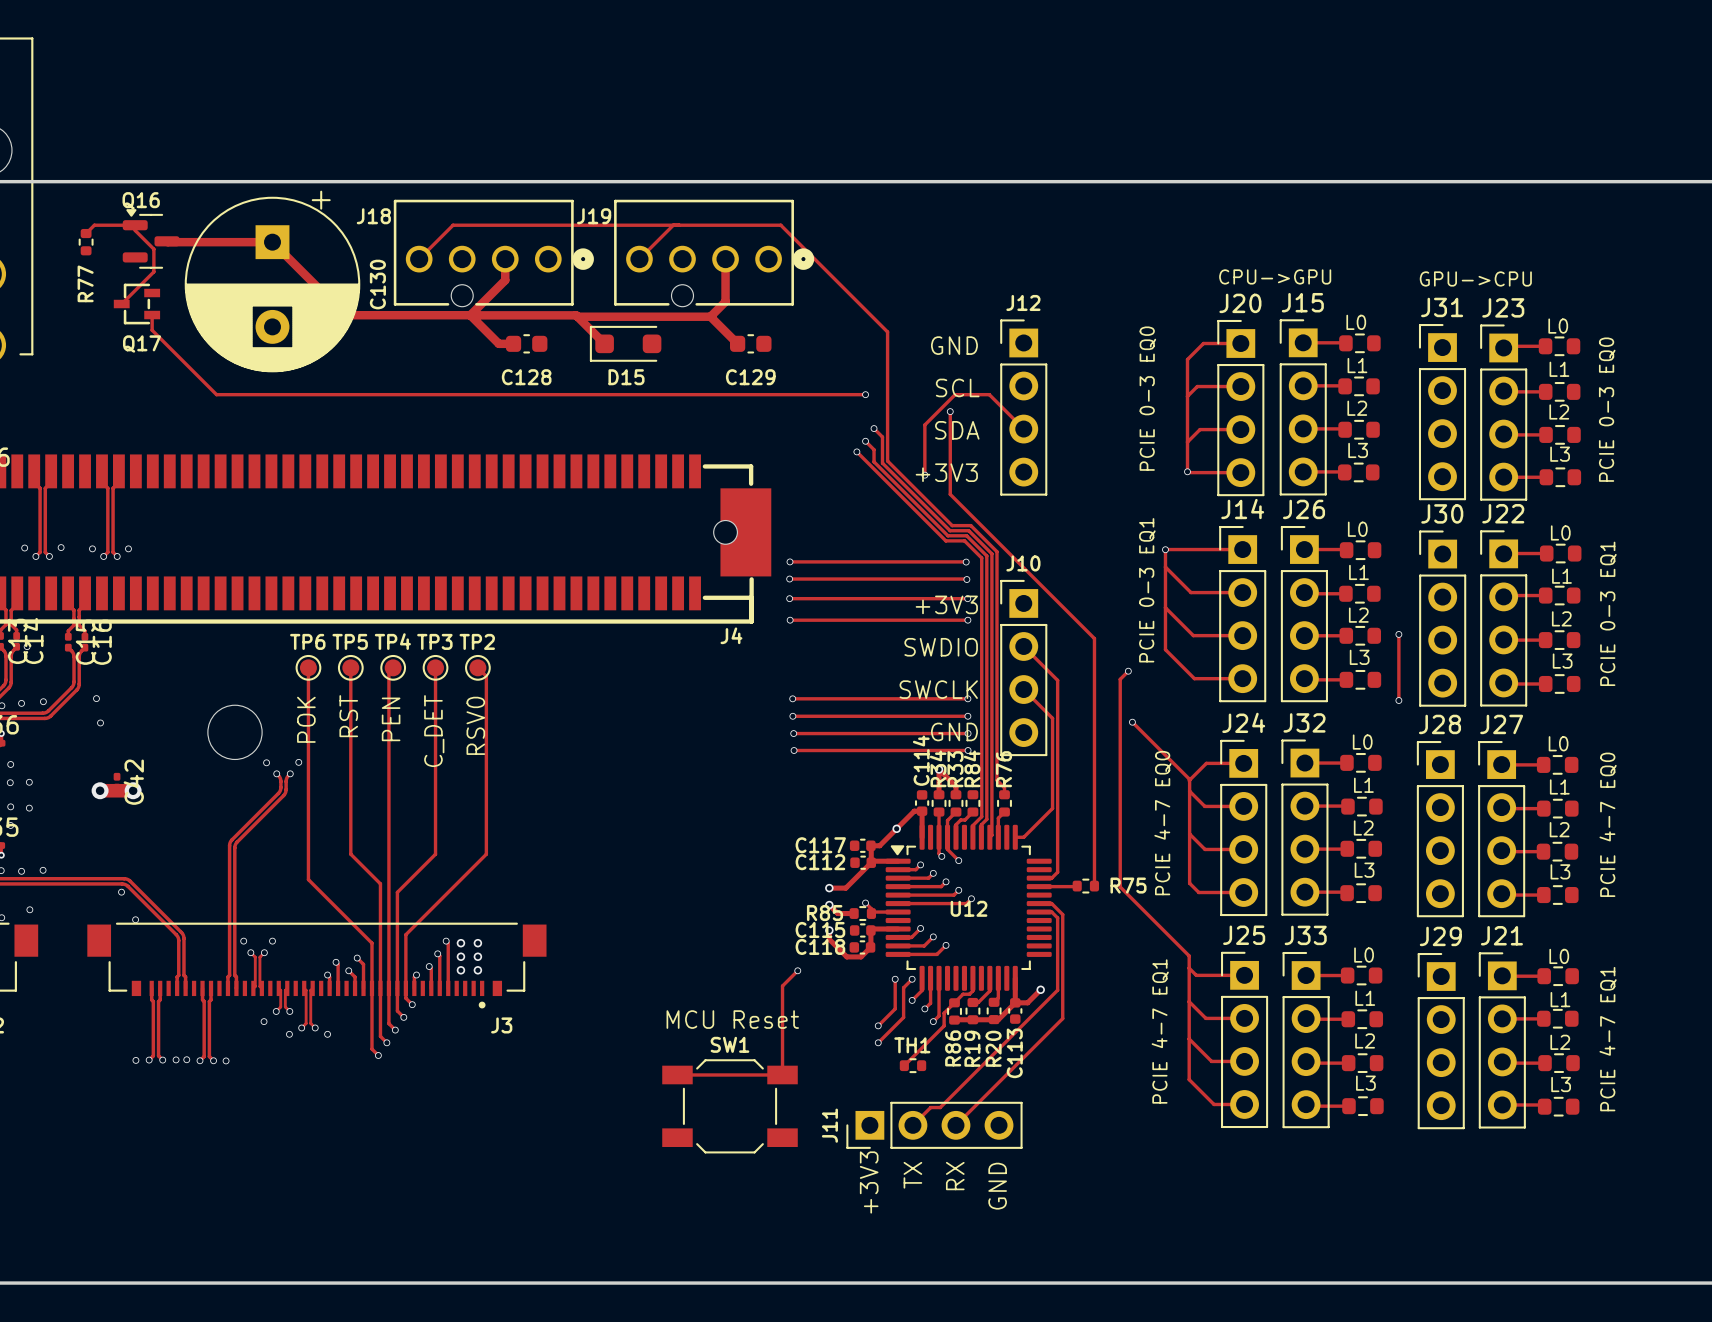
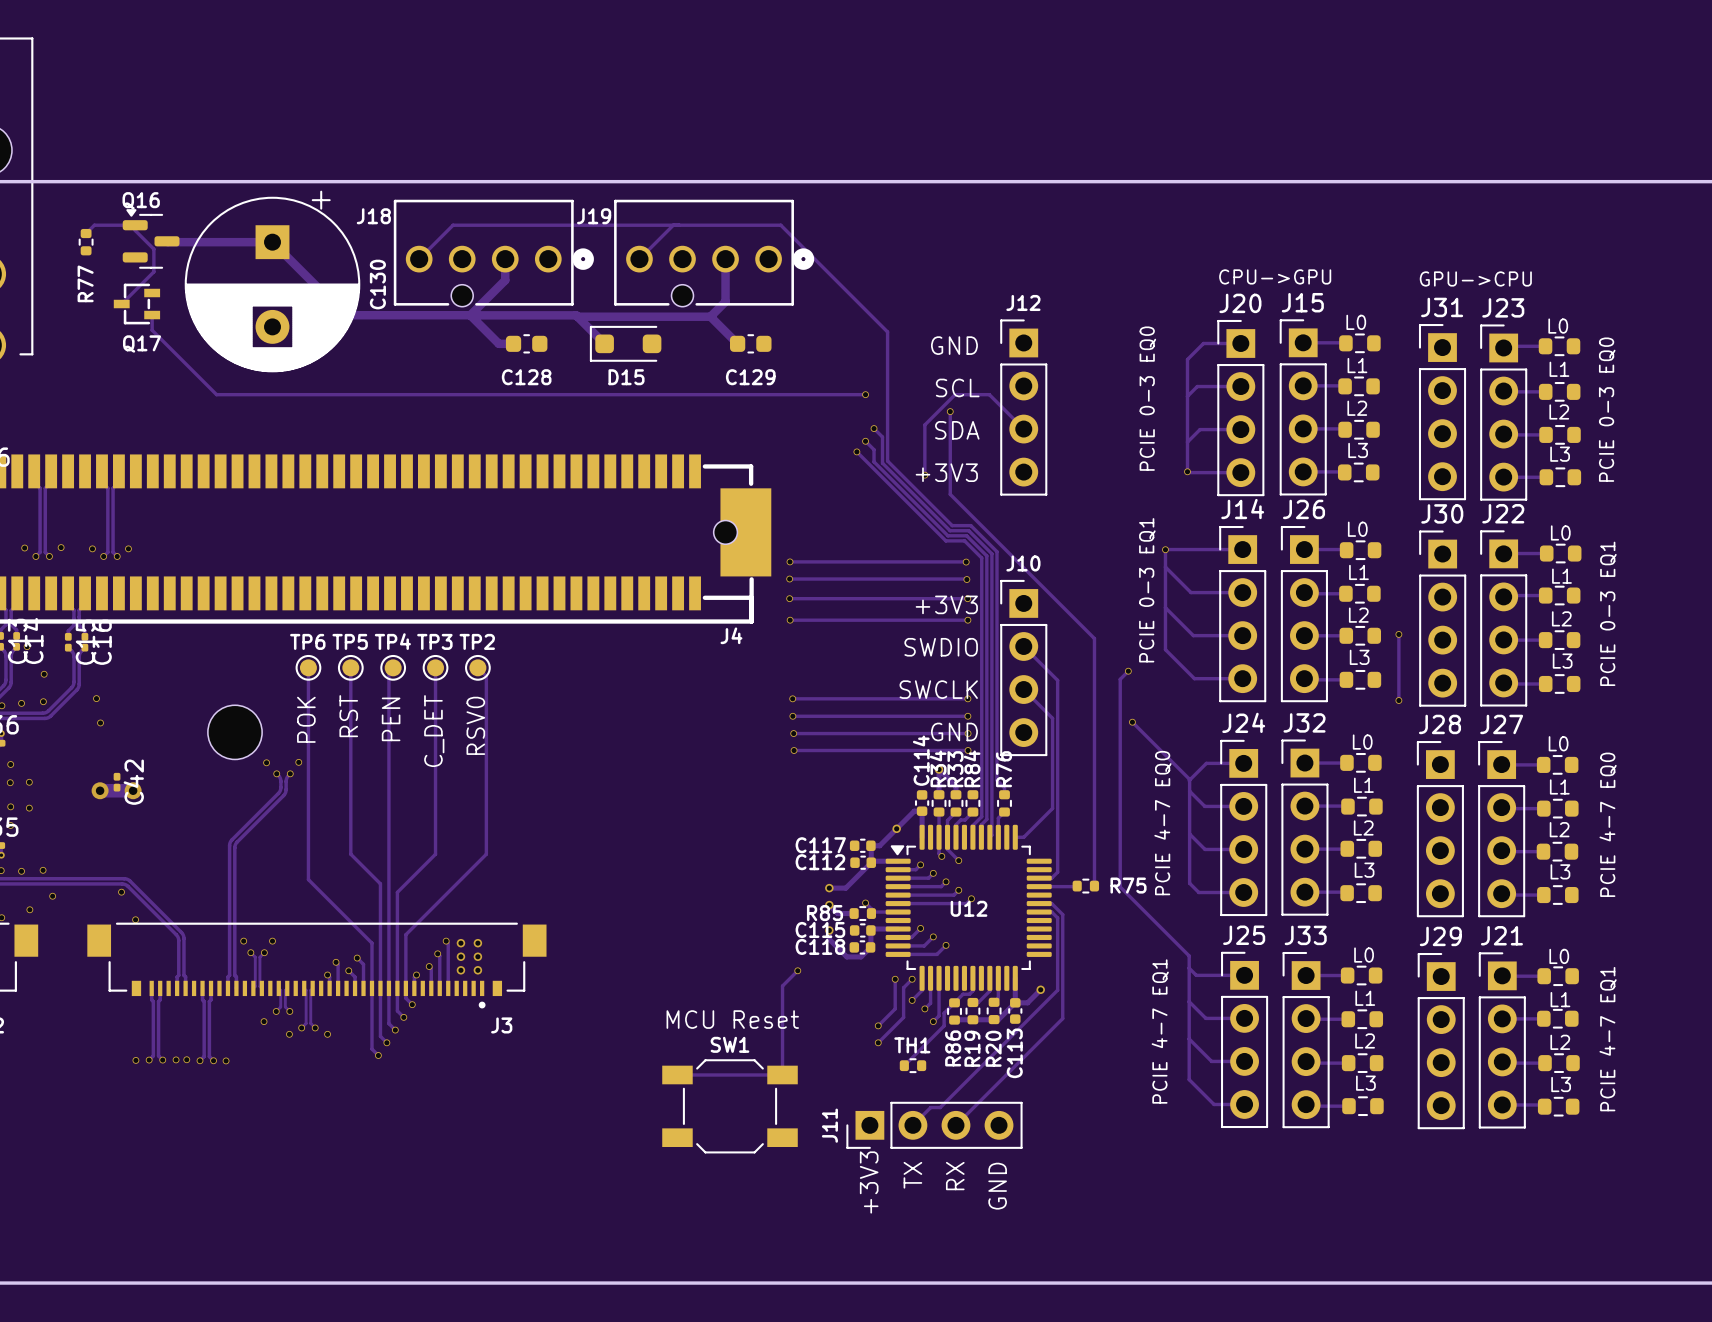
via: none -> (44, 674)
via: none -> (52, 896)

